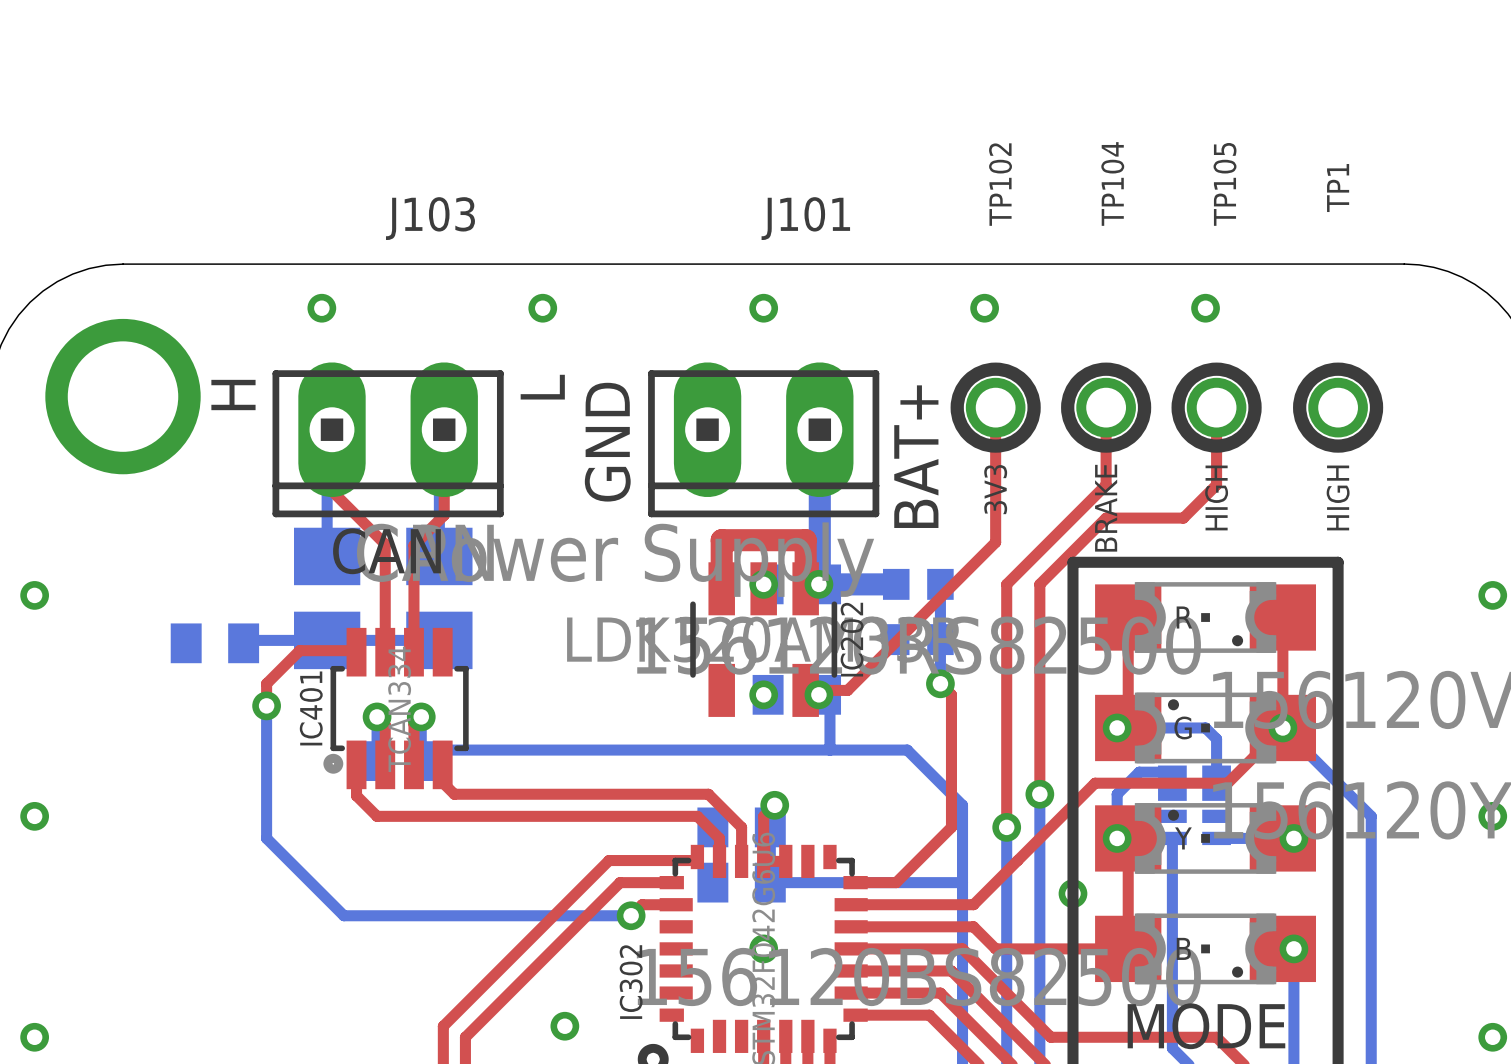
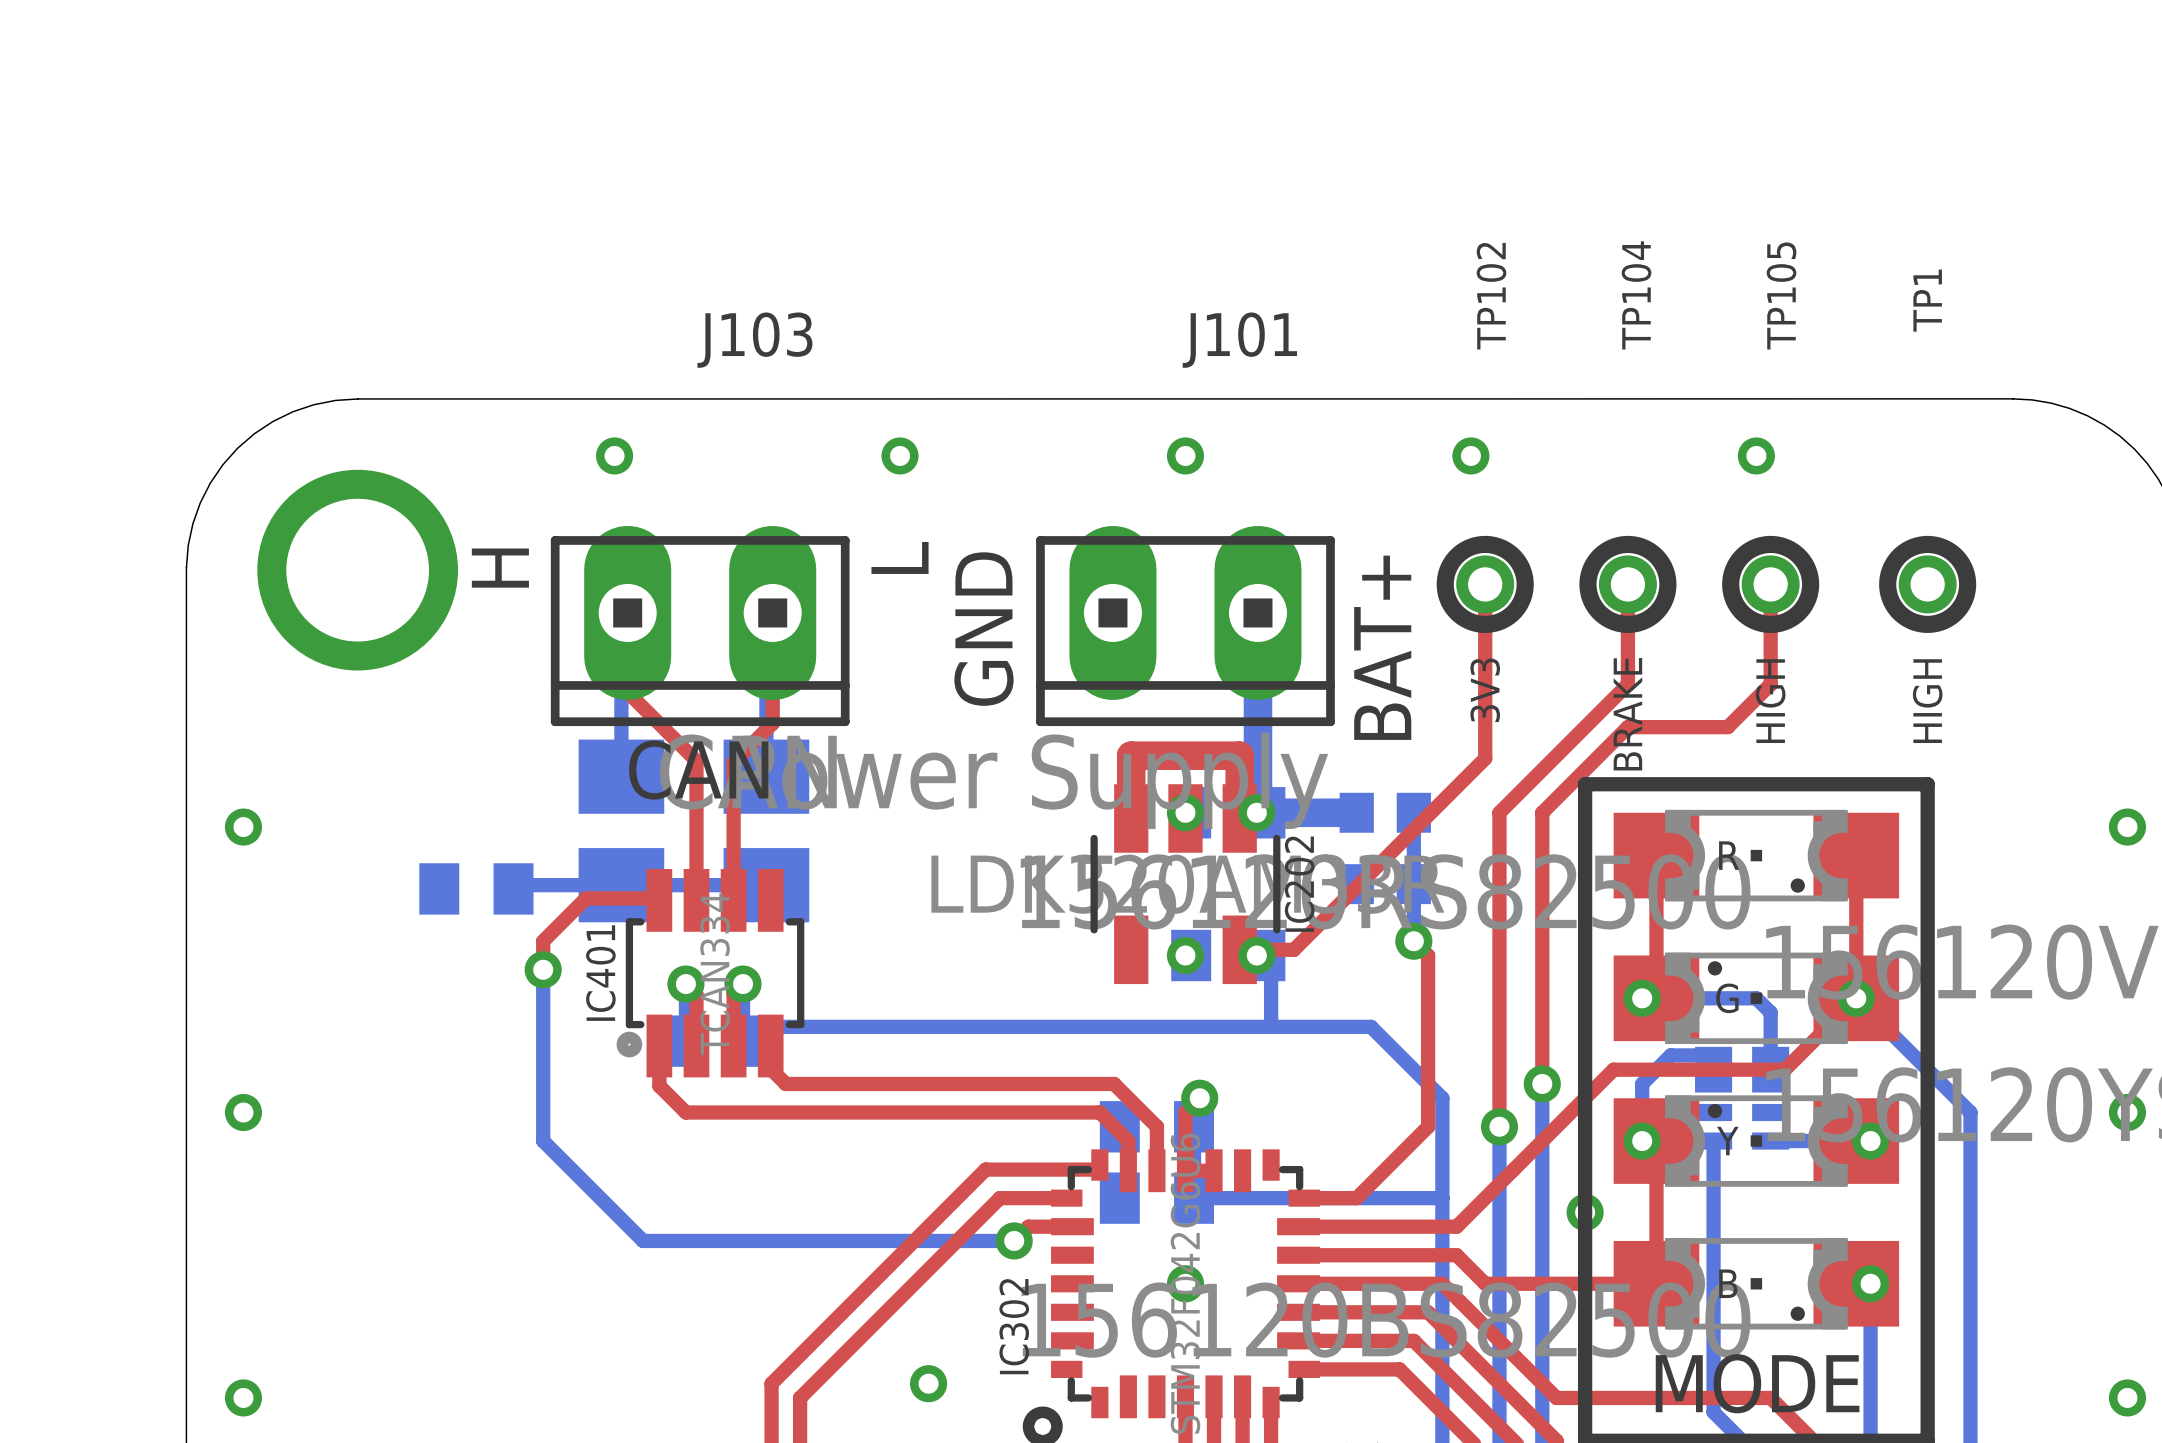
TP102 footprint: [950, 362, 1041, 453] -> [1436, 535, 1534, 633]
TP104 footprint: [1061, 362, 1152, 453] -> [1579, 535, 1677, 633]
TP105 footprint: [1171, 362, 1262, 453] -> [1722, 535, 1820, 633]
TP1 footprint: [1293, 362, 1384, 453] -> [1879, 535, 1977, 633]

